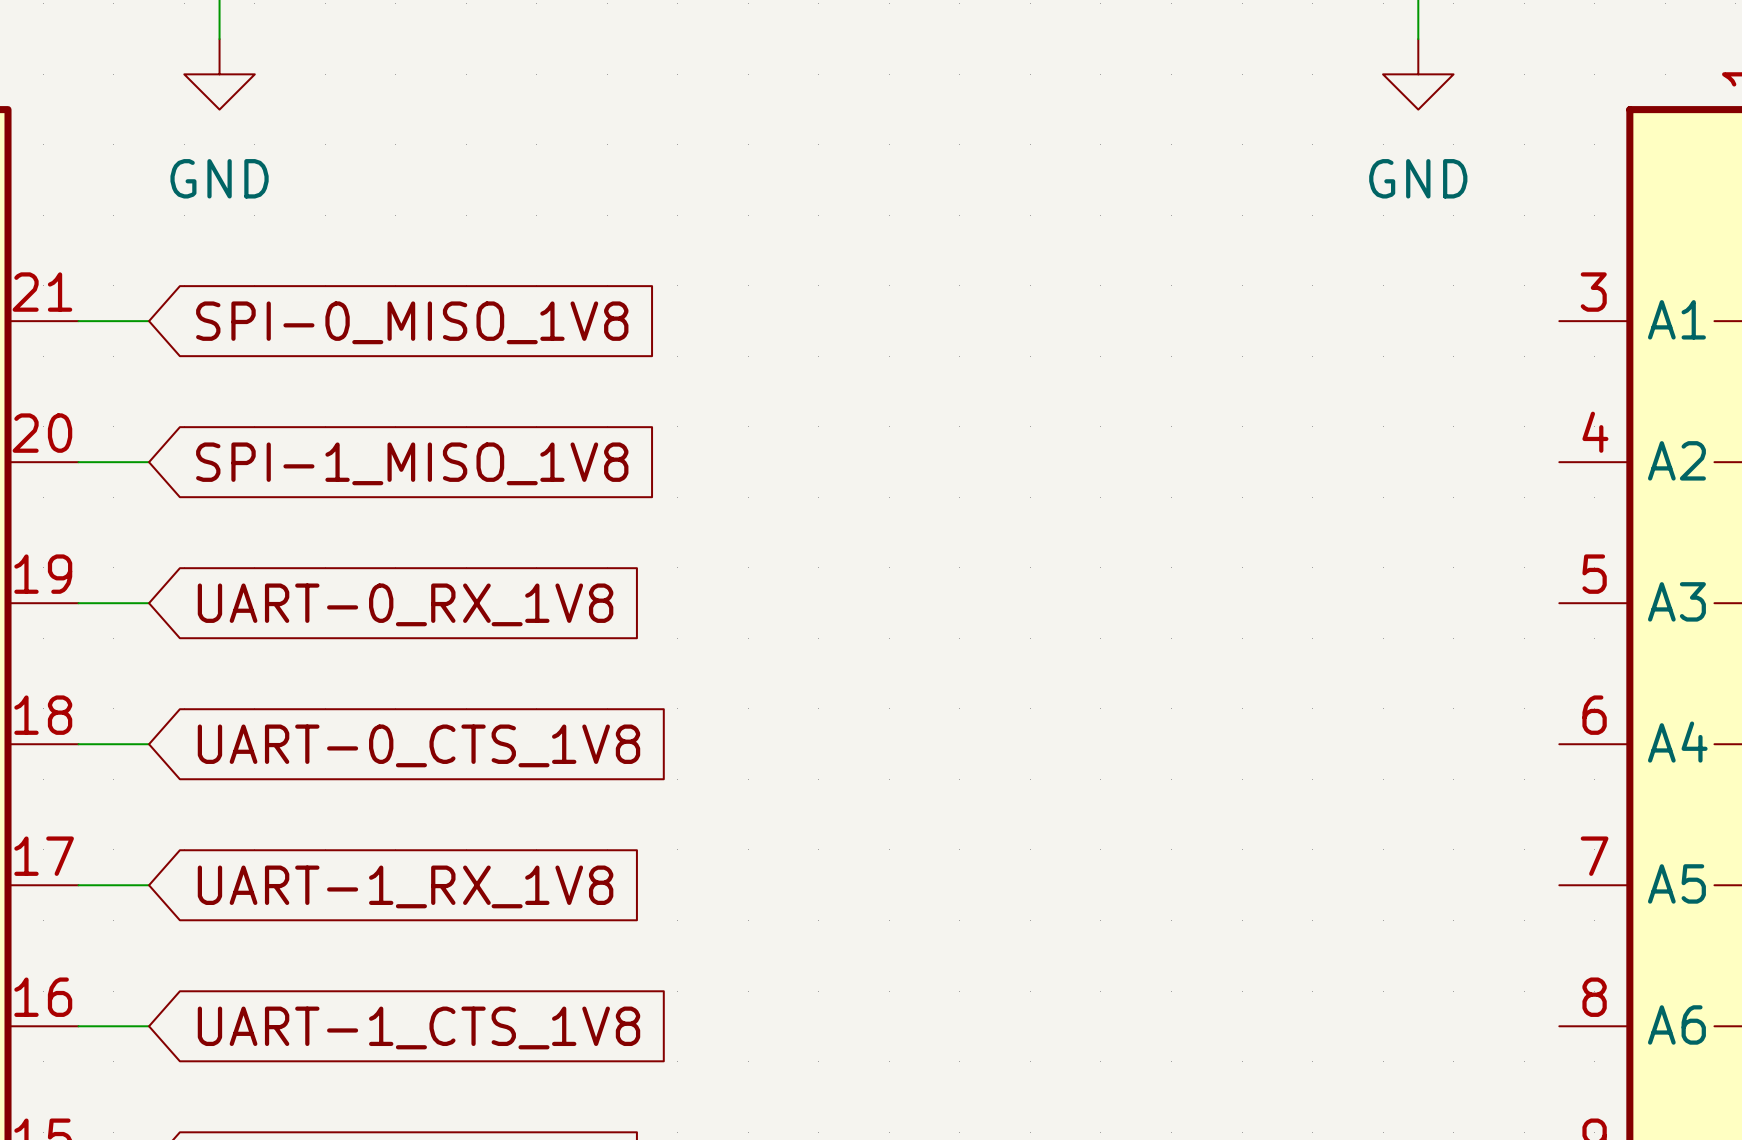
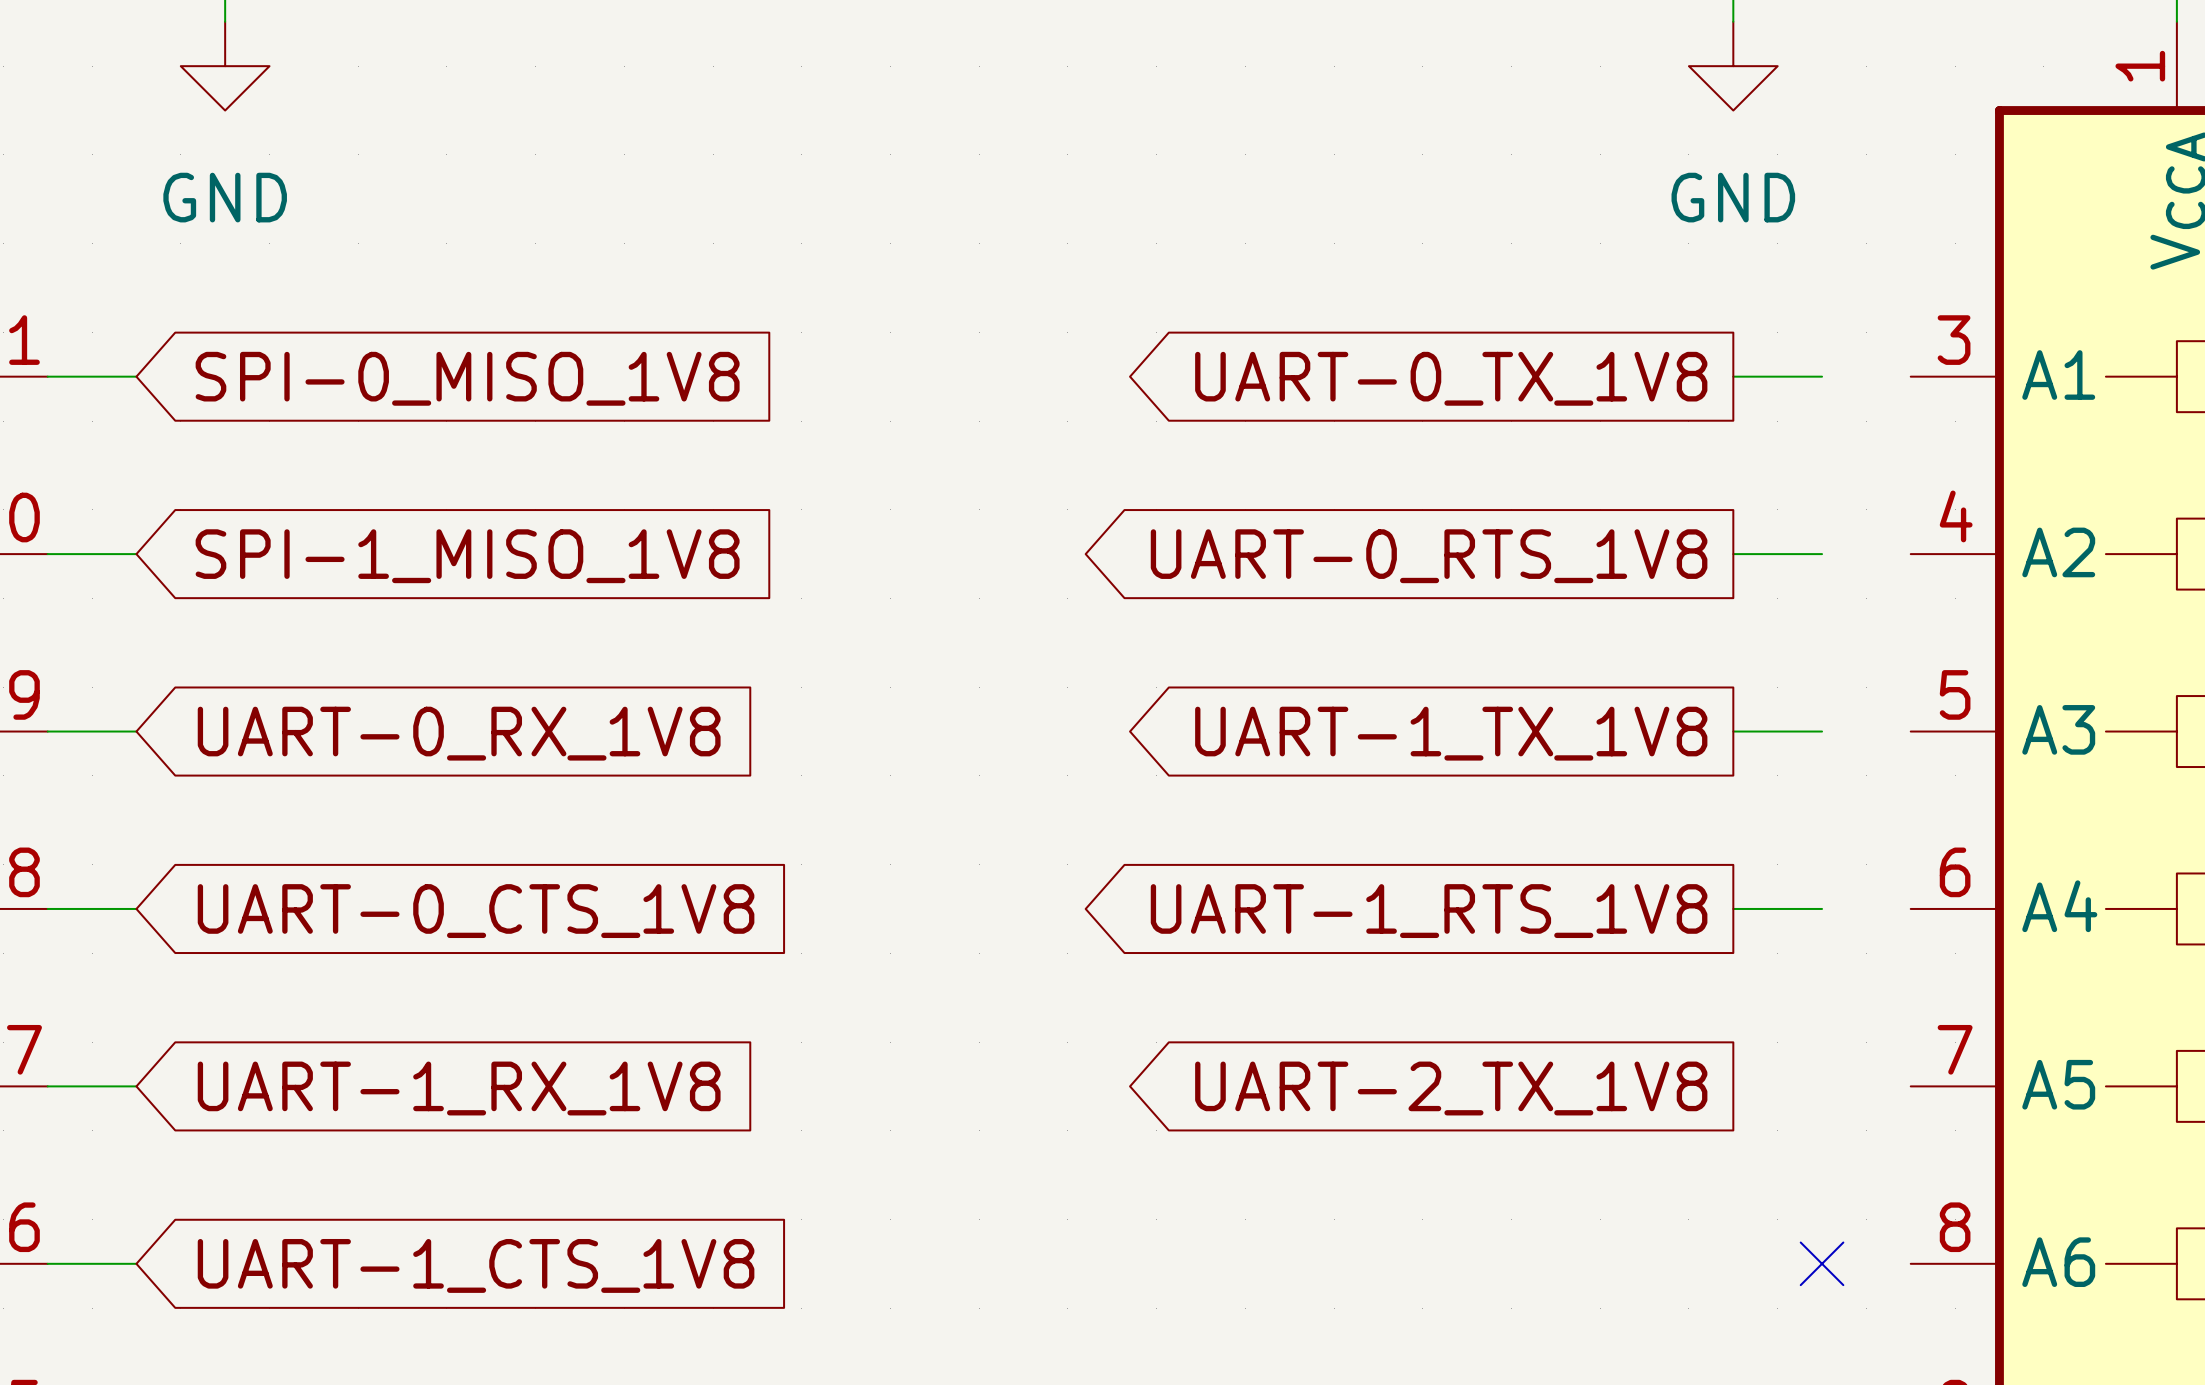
wire: none -> (1733, 376) (1822, 376)
global label: none -> UART-0_TX_1V8 (1451, 378)
wire: none -> (1733, 554) (1822, 554)
global label: none -> UART-0_RTS_1V8 (1429, 556)
wire: none -> (1733, 731) (1822, 731)
global label: none -> UART-1_TX_1V8 (1451, 733)
wire: none -> (1733, 908) (1822, 908)
global label: none -> UART-1_RTS_1V8 (1429, 911)
global label: none -> UART-2_TX_1V8 (1451, 1088)
no-connect mark: none -> (1822, 1263)

